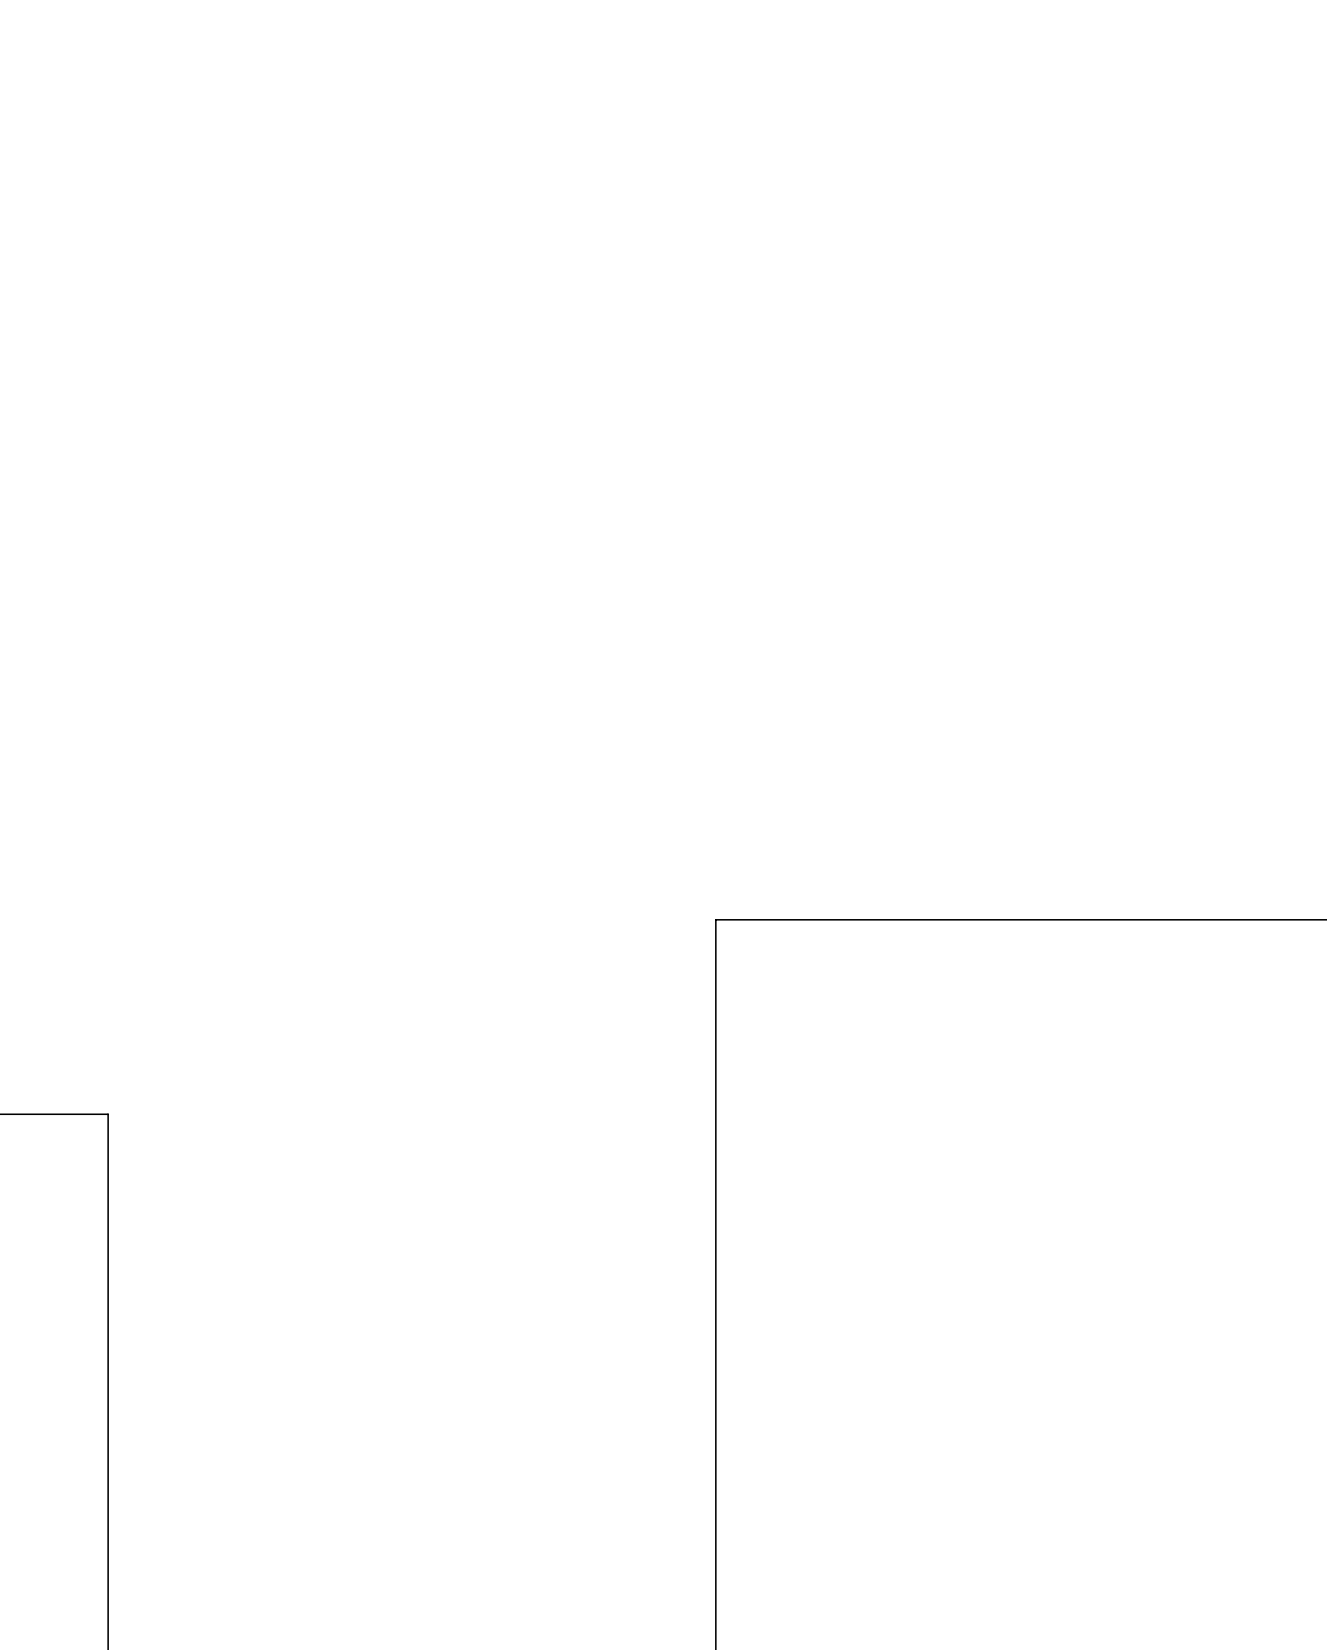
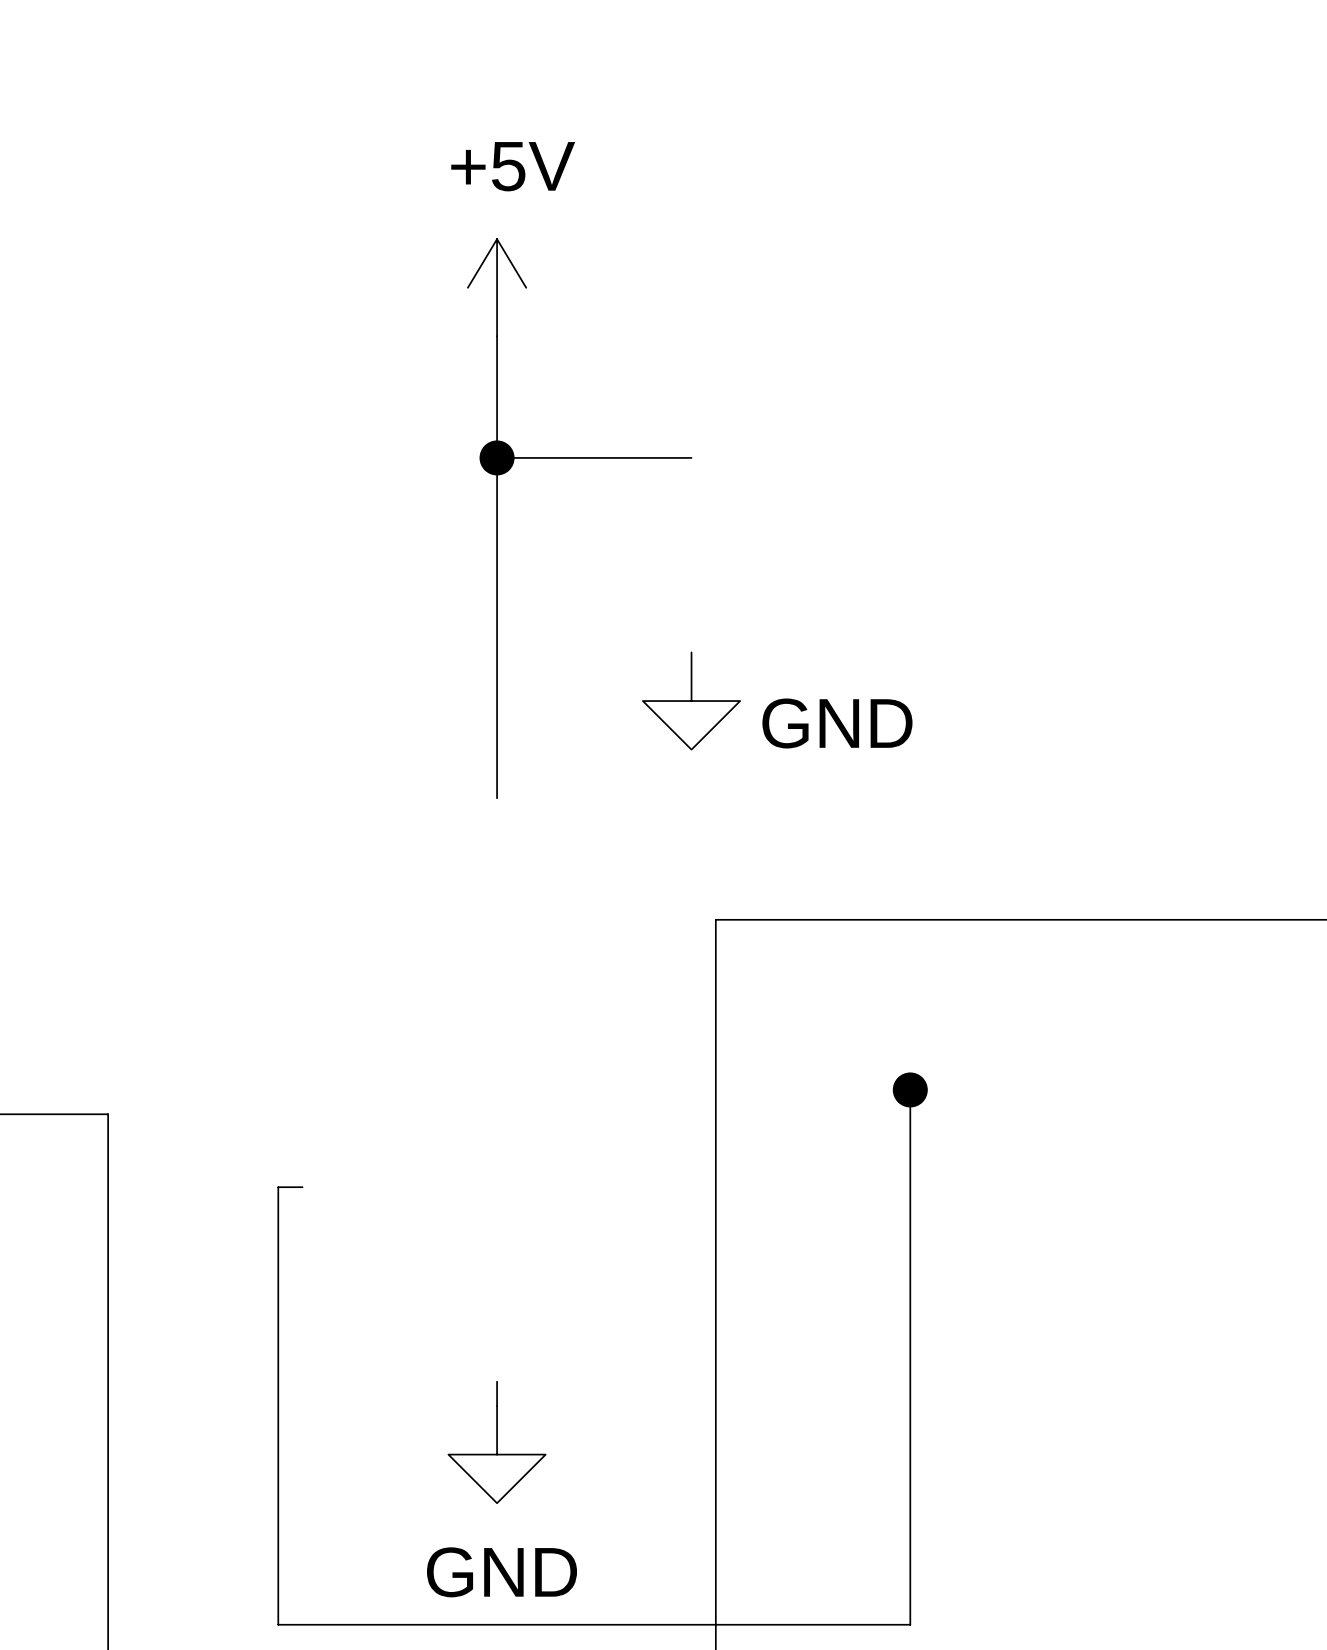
power symbol: none -> +5V (497, 287)
wire: none -> (497, 336) (497, 798)
wire: none -> (497, 457) (691, 457)
junction: none -> (497, 457)
power symbol: none -> GND (691, 701)
wire: none -> (910, 1089) (910, 1624) (278, 1624) (278, 1187) (302, 1187)
junction: none -> (910, 1089)
wire: none -> (497, 1381) (497, 1405)
power symbol: none -> GND (497, 1454)

